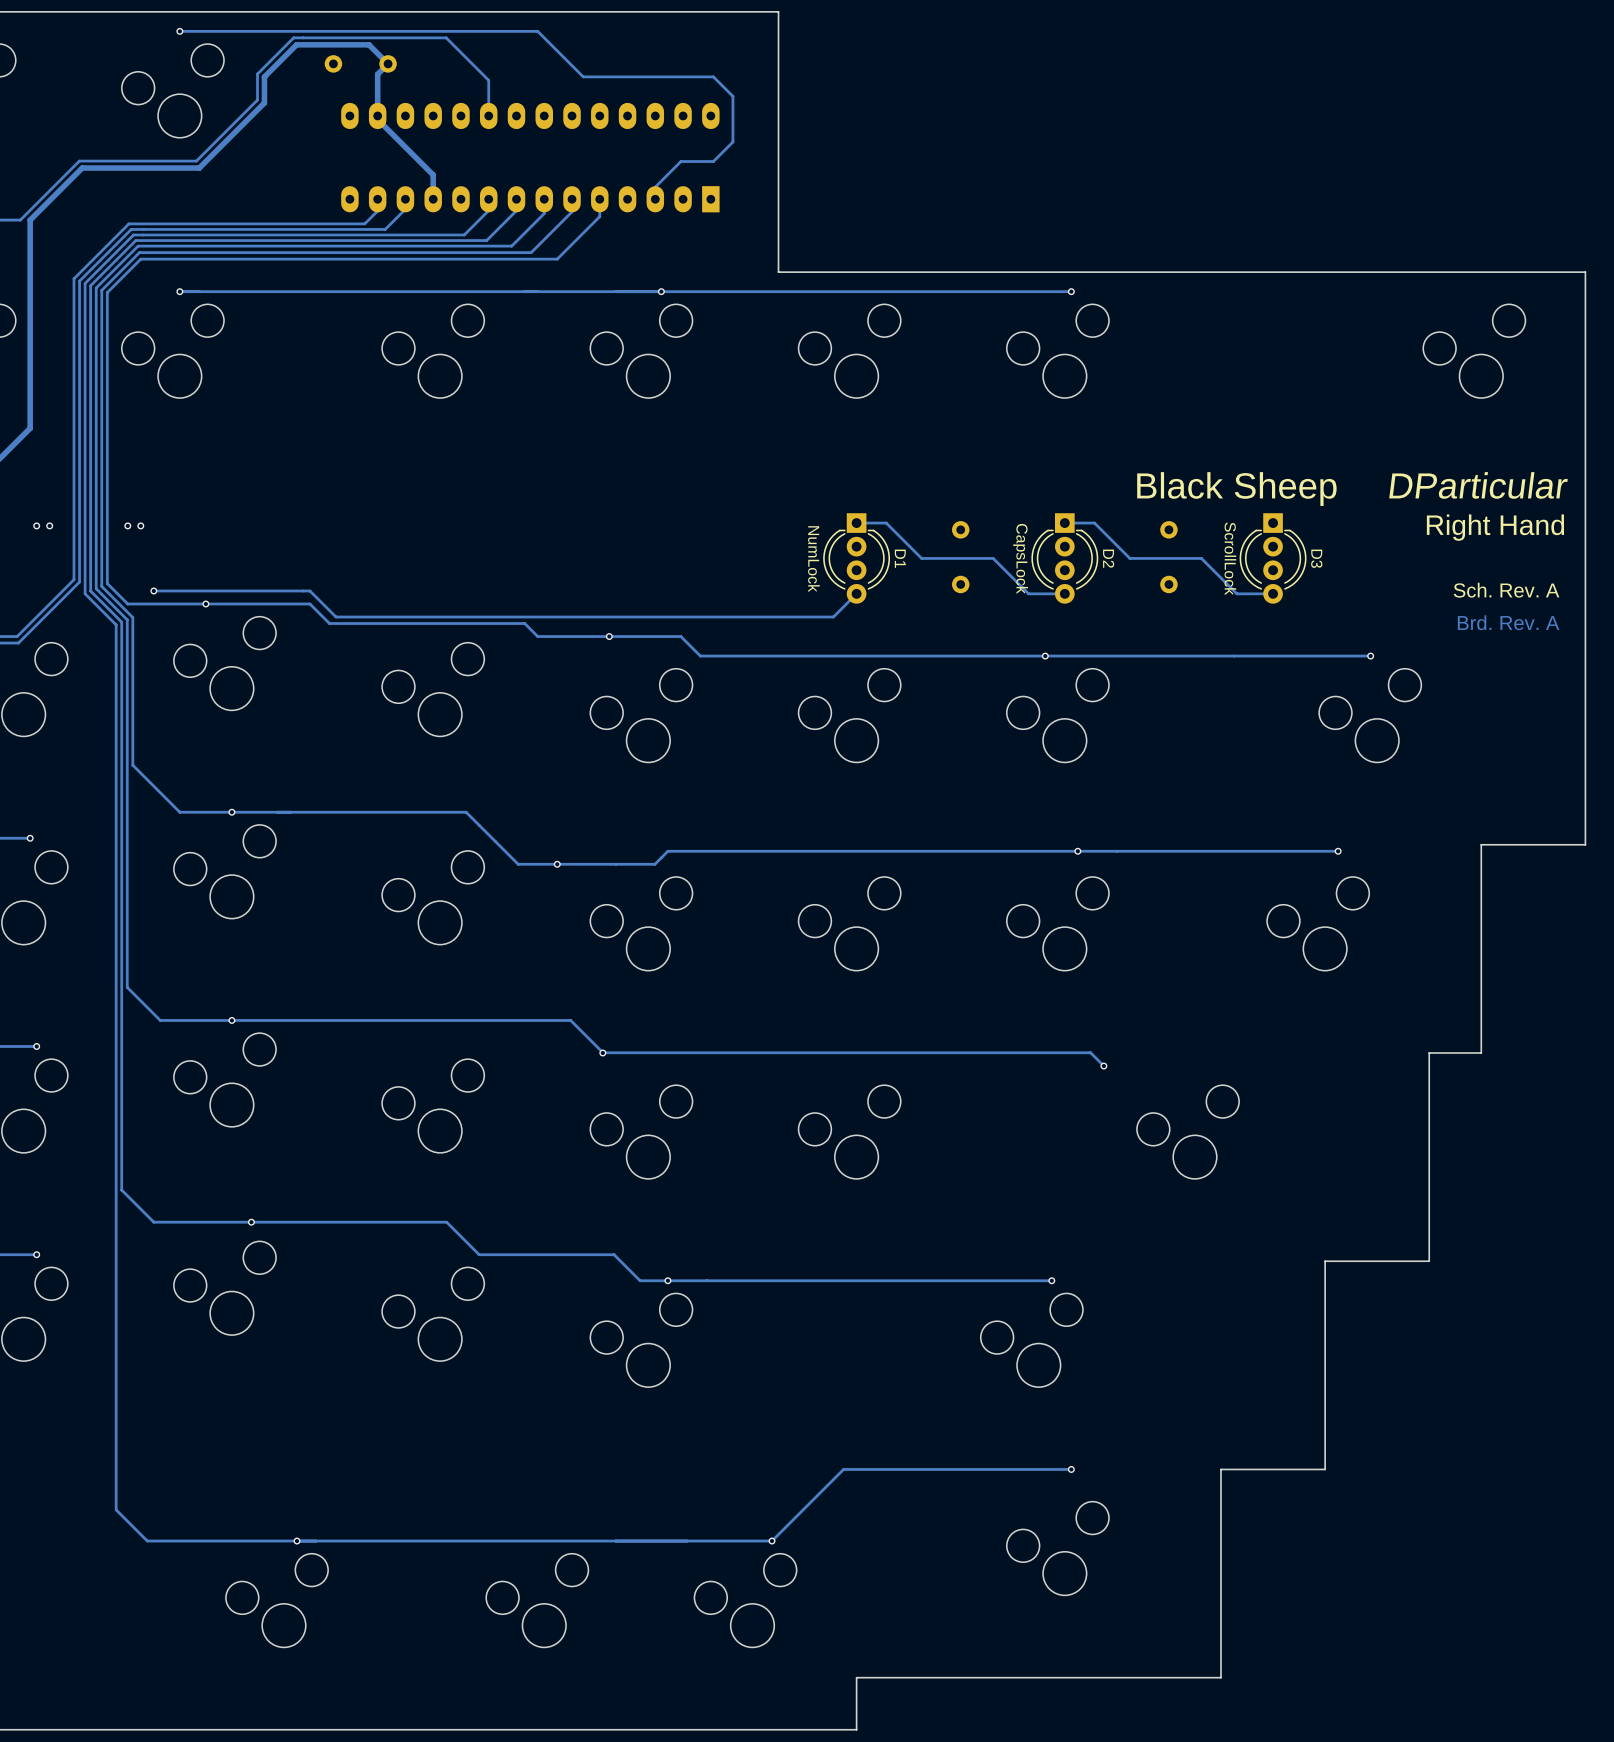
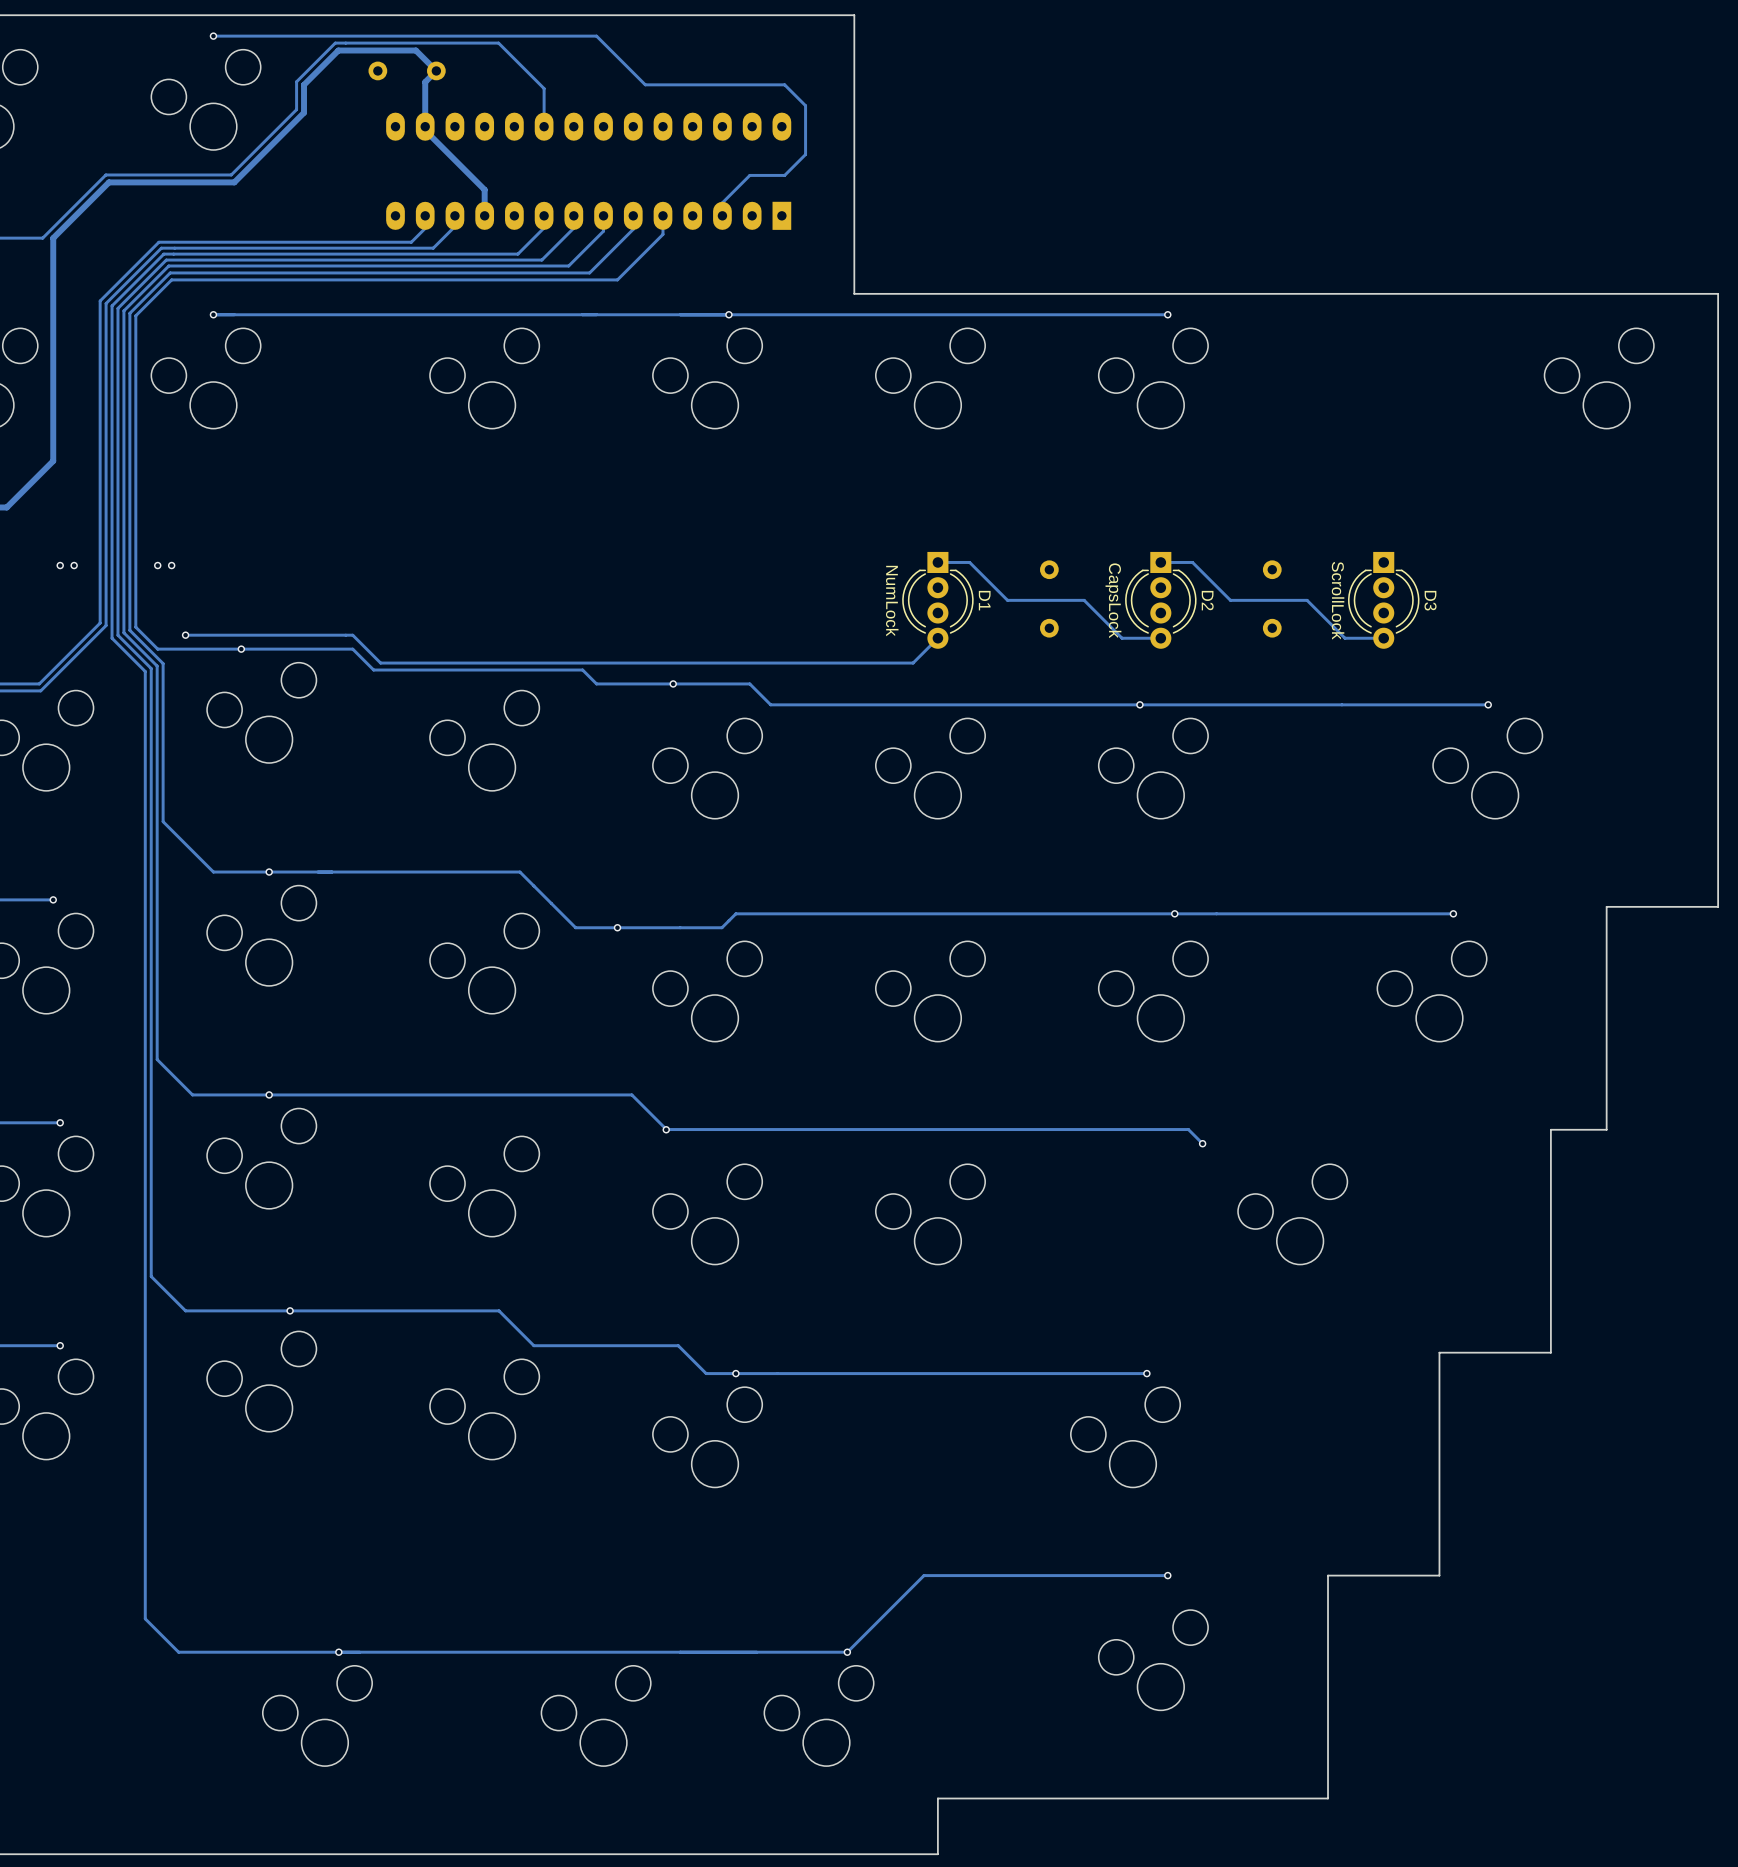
text: DParticular (1478, 485) -> none
text: Black Sheep (1236, 489) -> none
text: Right Hand (1495, 527) -> none
text: Sch. Rev. A (1506, 590) -> none
text: Brd. Rev. A (1508, 622) -> none

